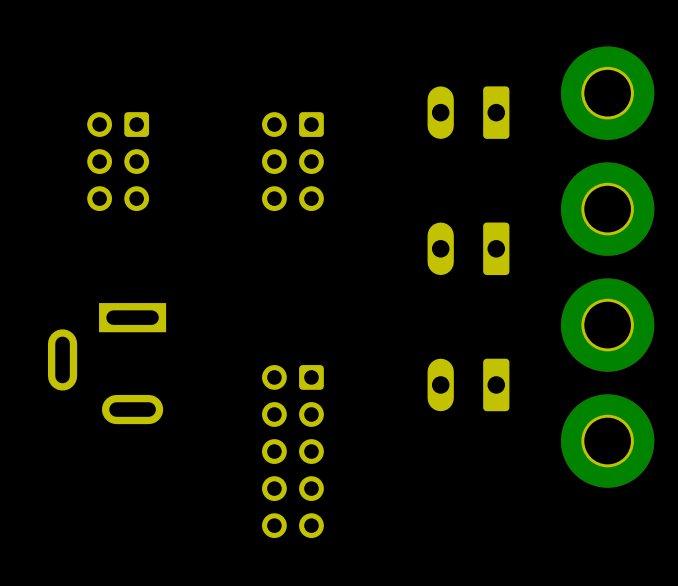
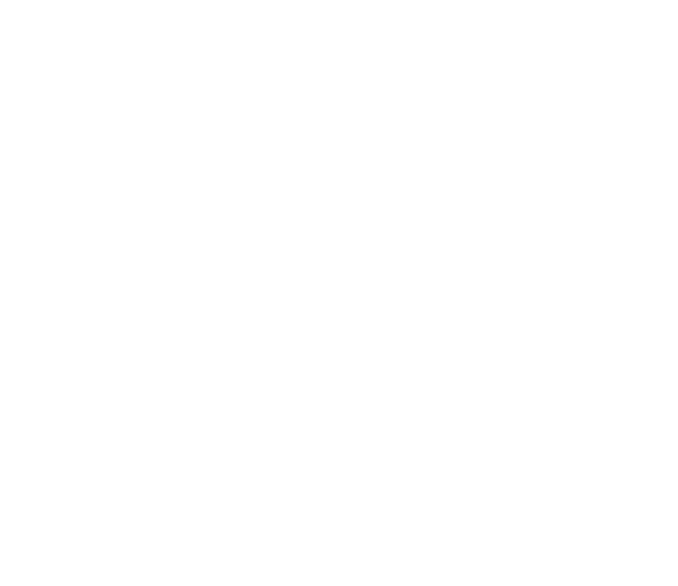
part: (607, 93) -> none
part: (468, 112) -> none
part: (118, 161) -> none
part: (292, 161) -> none
part: (607, 209) -> none
part: (468, 248) -> none
part: (607, 325) -> none
part: (107, 363) -> none
part: (468, 384) -> none
part: (607, 441) -> none
part: (292, 451) -> none

